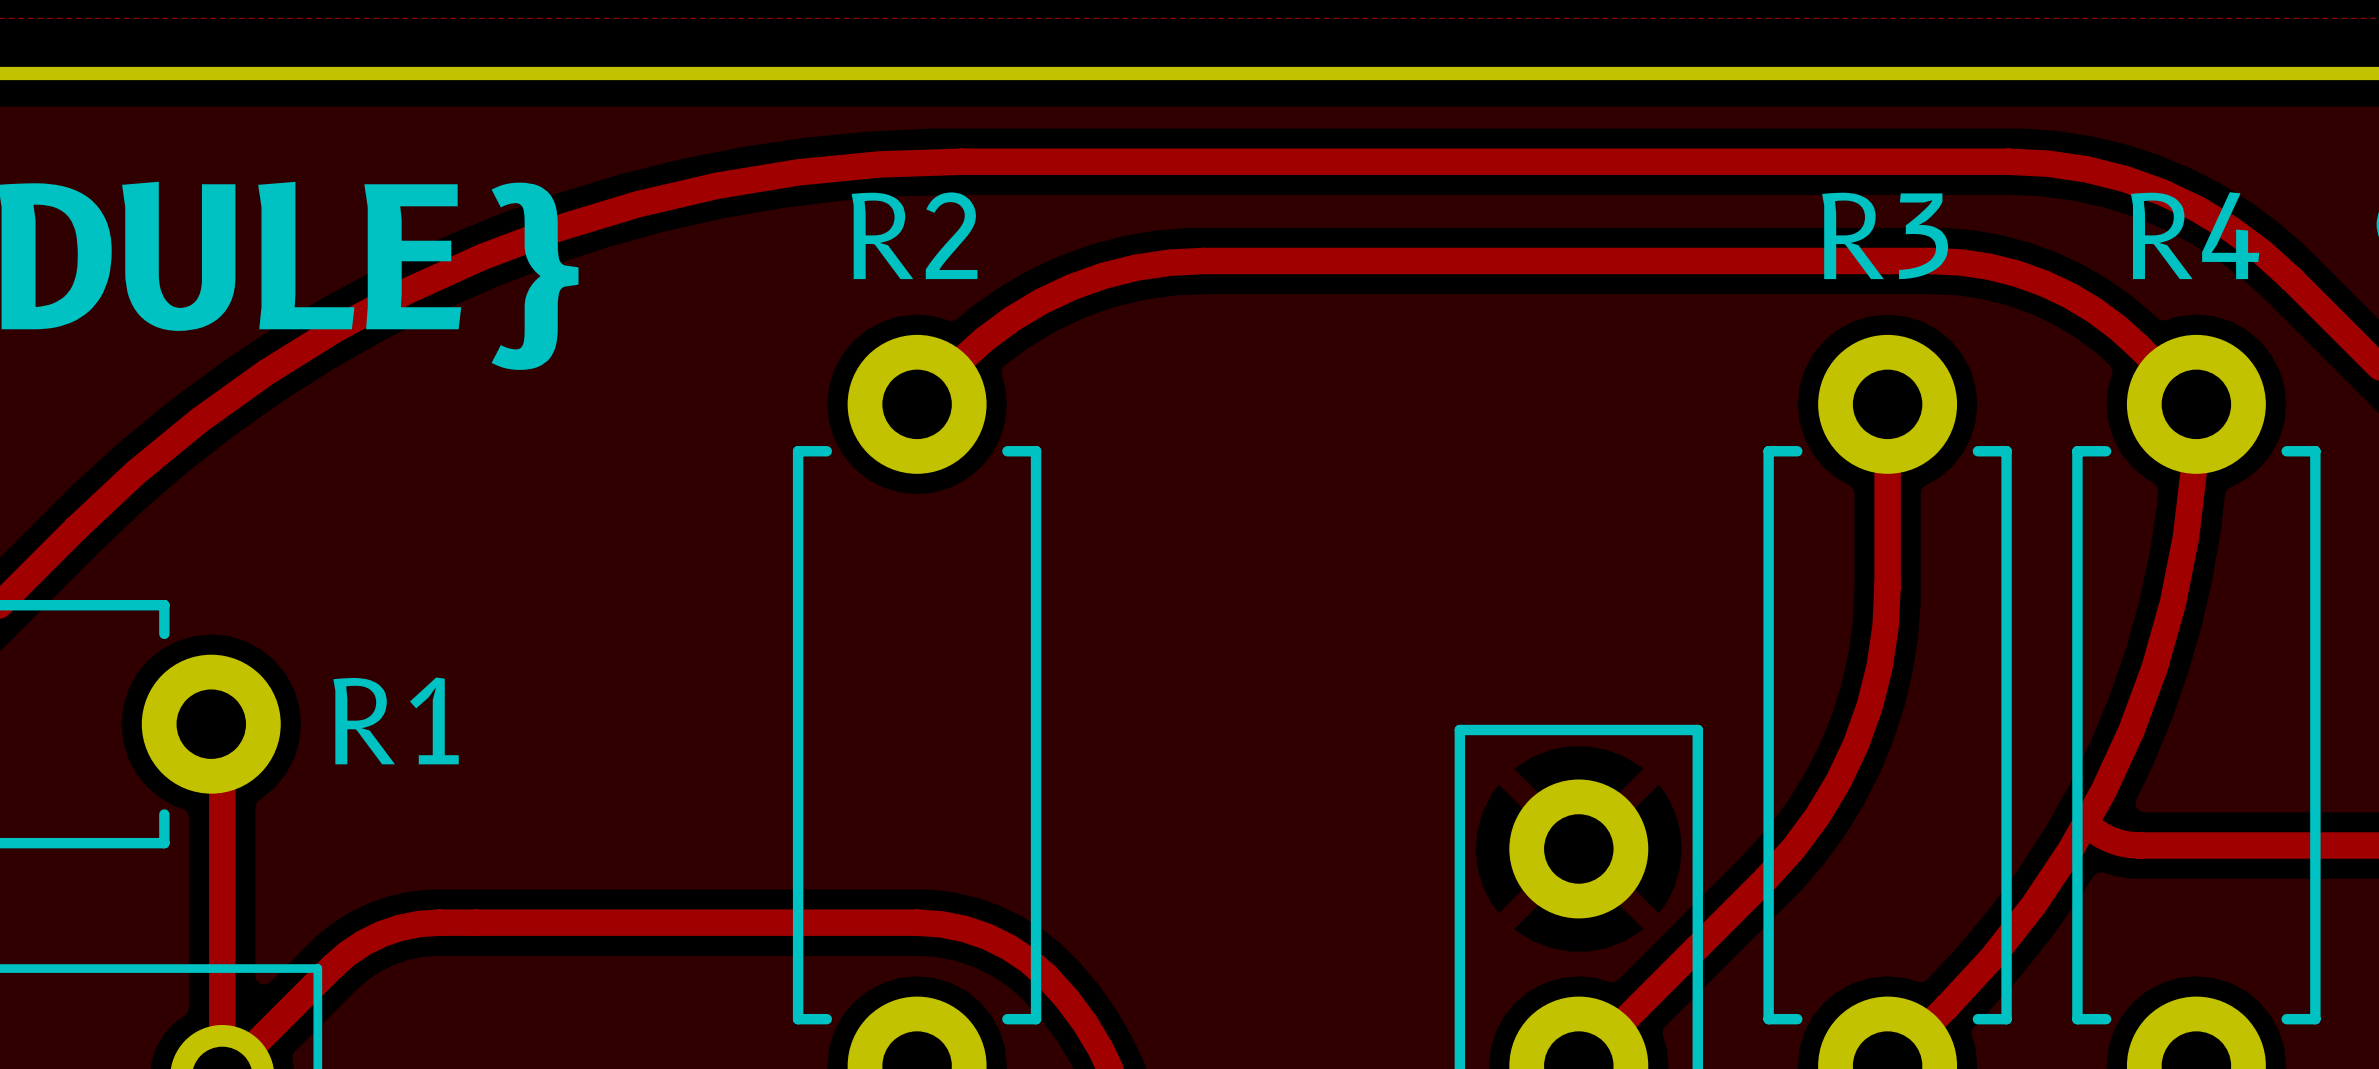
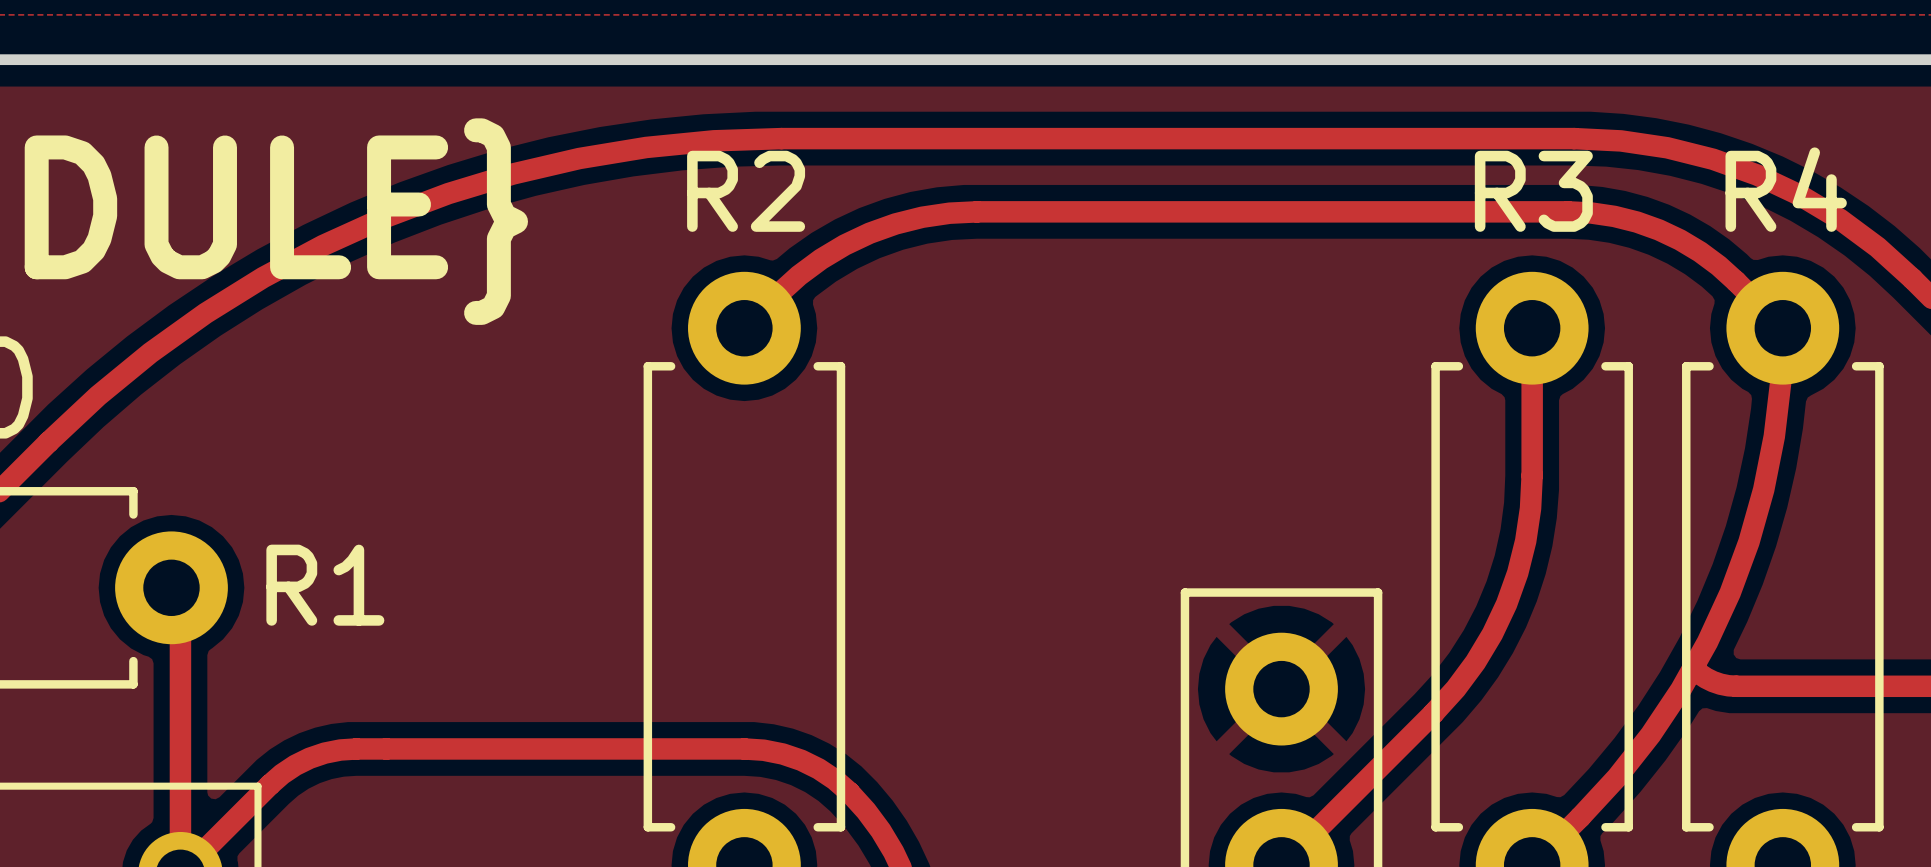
track: (2356, 343) (2262, 252) (2230, 229) (2197, 208) (2161, 192) (2124, 178) (2086, 169) (2048, 163) (2008, 161) (961, 161) (879, 164) (797, 172) (717, 185) (637, 204) (558, 228) (482, 256) (407, 290) (335, 329) (265, 372) (199, 420) (136, 472) (59, 544) -> (1912, 278) (1877, 247) (1839, 219) (1799, 195) (1757, 175) (1712, 159) (1667, 147) (1620, 140) (1574, 138) (781, 138) (713, 140) (646, 147) (579, 158) (513, 173) (448, 193) (384, 217) (323, 245) (263, 277) (205, 313) (150, 352) (98, 395) (48, 442)

